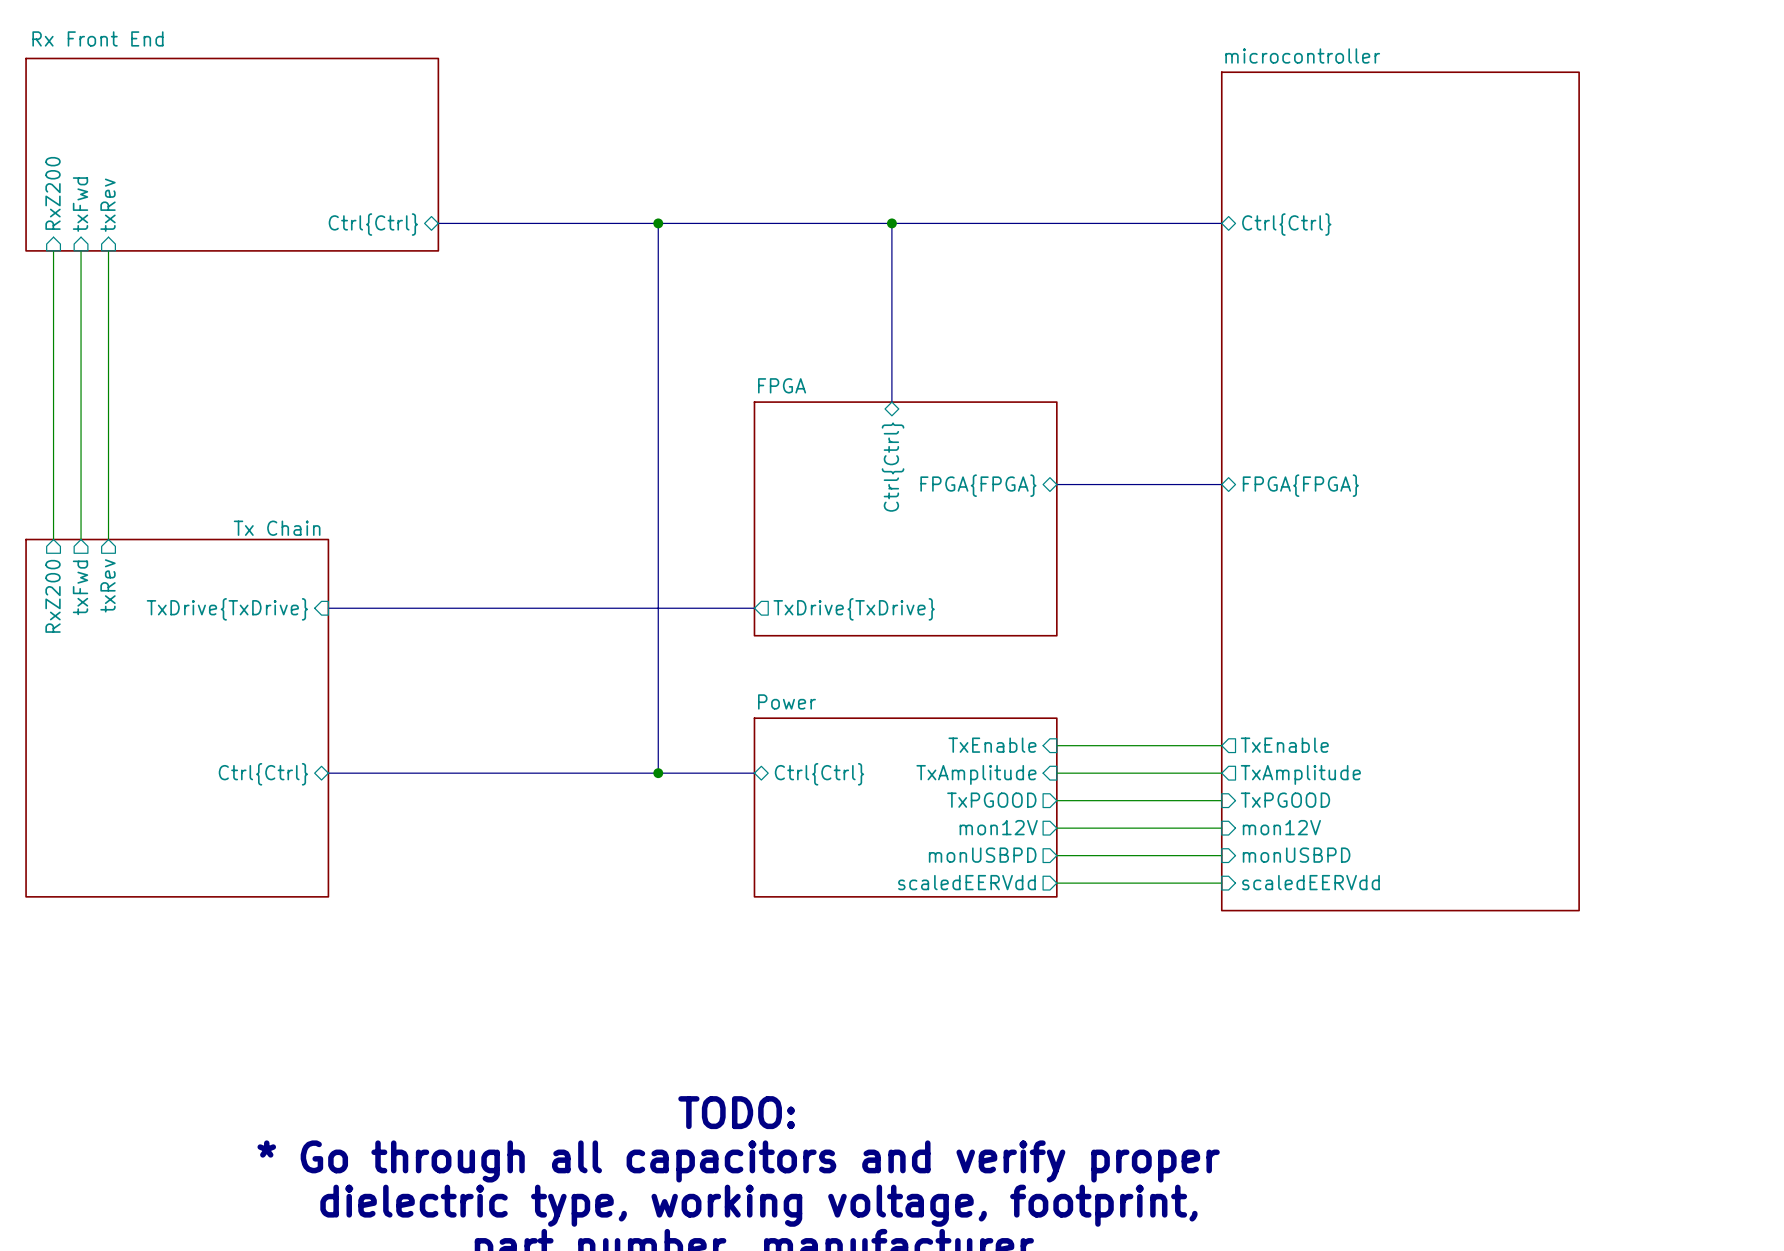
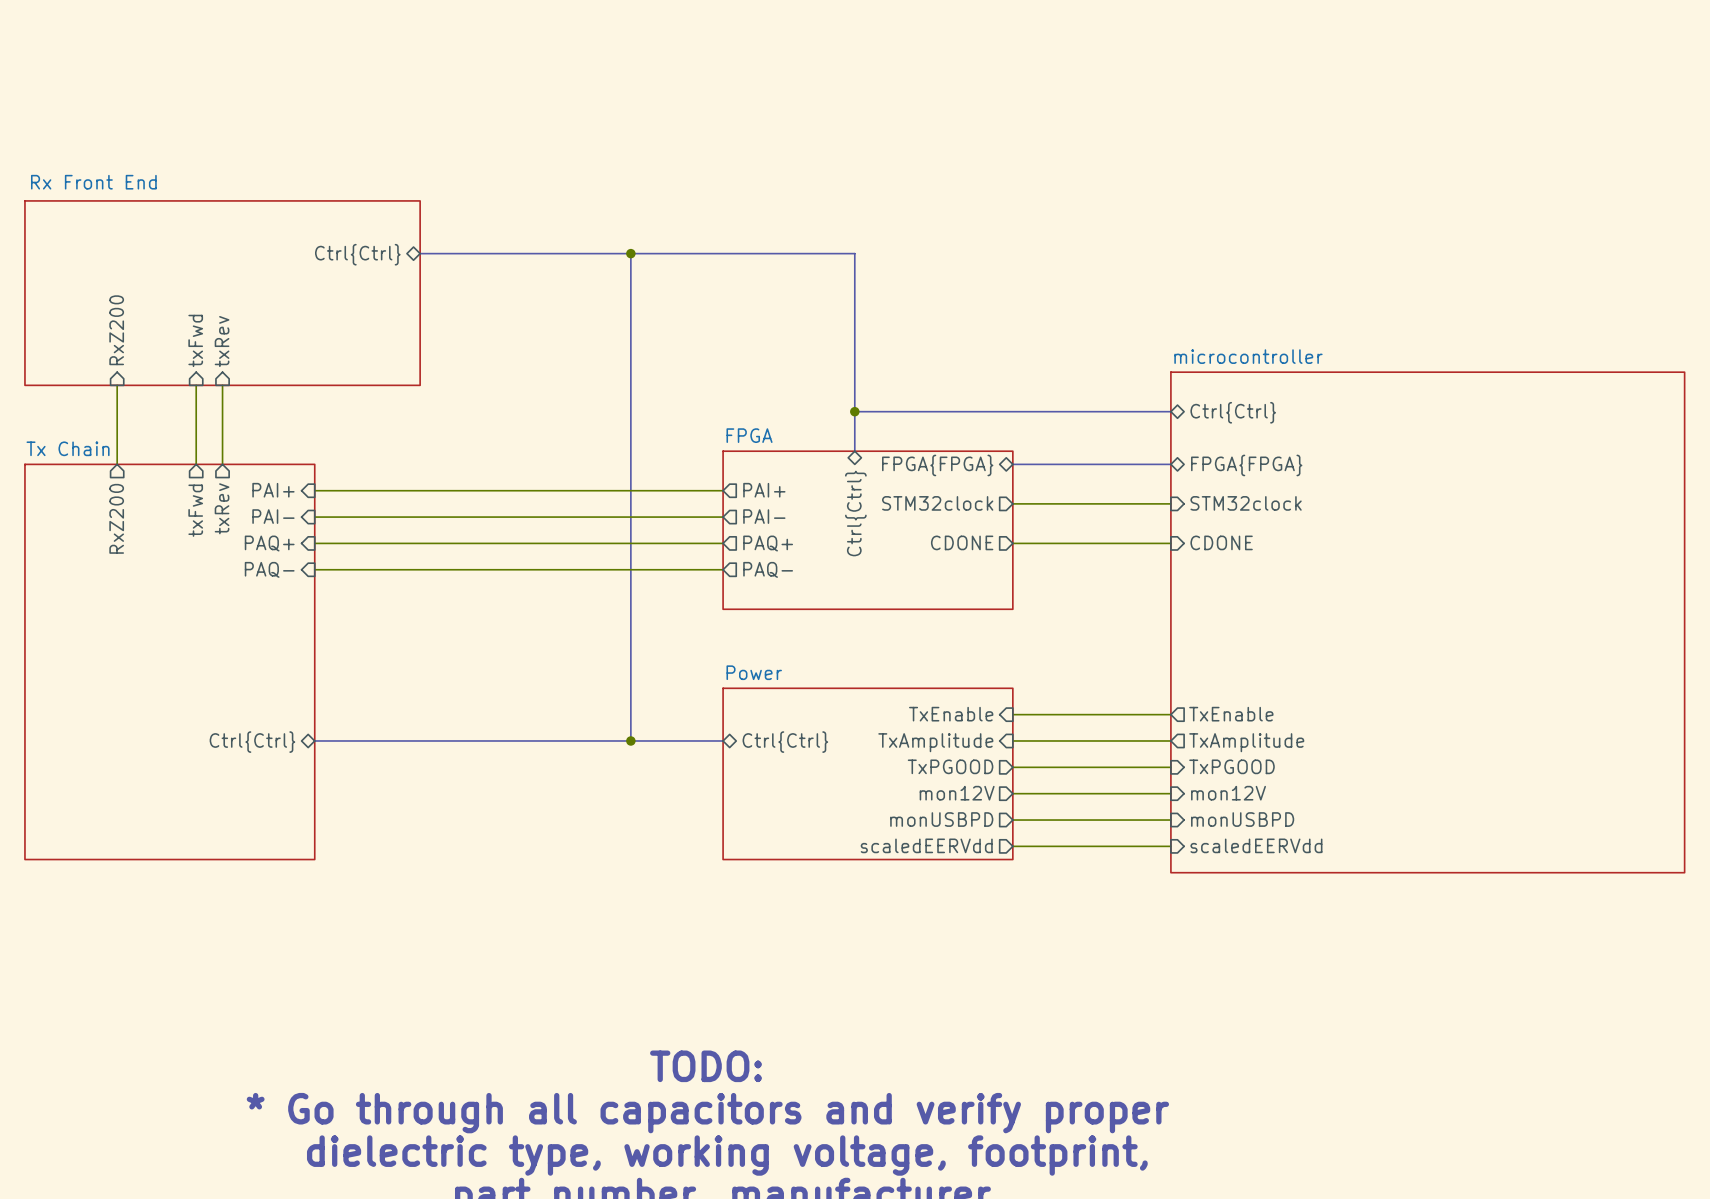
sheet Rx Front End position: (232, 154) -> (222, 293)
sheet pin: RxZ200 (53, 193) -> none
sheet pin: txFwd (80, 204) -> none
sheet pin: txRev (108, 205) -> none
bus: (438, 223) (1221, 223) -> none
bus: (658, 223) (658, 264) -> none
junction position: (658, 223) -> (630, 253)
bus: (891, 223) (891, 264) -> (420, 253) (854, 253)
junction: (891, 223) -> none
sheet pin position: Ctrl{Ctrl} (373, 224) -> Ctrl{Ctrl} (357, 254)
sheet pin: Ctrl{Ctrl} (1286, 224) -> none
wire: (53, 250) (53, 539) -> none
wire: (81, 250) (81, 539) -> none
wire: (108, 250) (108, 539) -> none
sheet pin: none -> RxZ200 (116, 330)
sheet pin: none -> txFwd (195, 340)
sheet pin: none -> txRev (222, 341)
wire: none -> (117, 385) (117, 464)
wire: none -> (196, 385) (196, 464)
wire: none -> (222, 385) (222, 464)
bus: none -> (854, 385) (854, 451)
bus: none -> (854, 411) (1170, 411)
junction: none -> (854, 411)
sheet pin: none -> Ctrl{Ctrl} (1233, 412)
sheet pin position: Ctrl{Ctrl} (893, 467) -> Ctrl{Ctrl} (855, 513)
sheet microcontroller: (1400, 491) -> none
sheet pin: none -> PAI+ (273, 490)
sheet pin: none -> PAI+ (764, 490)
wire: none -> (314, 490) (723, 490)
sheet FPGA: (905, 518) -> none
sheet pin: none -> STM32clock (937, 503)
wire: none -> (1012, 503) (1170, 503)
sheet pin: none -> STM32clock (1246, 503)
sheet pin: none -> txRev (222, 508)
sheet pin: none -> txFwd (195, 510)
sheet pin: none -> PAI- (273, 516)
wire: none -> (314, 517) (723, 517)
sheet pin: none -> PAI- (764, 516)
sheet FPGA: none -> (867, 530)
sheet pin: none -> CDONE (962, 542)
sheet pin: none -> CDONE (1221, 542)
sheet pin: none -> PAQ+ (269, 543)
wire: none -> (314, 543) (723, 543)
sheet pin: none -> PAQ+ (768, 543)
wire: none -> (1012, 543) (1170, 543)
sheet pin: txRev (108, 585) -> none
sheet pin: txFwd (80, 587) -> none
sheet pin: none -> PAQ- (269, 569)
wire: none -> (314, 569) (723, 569)
sheet pin: none -> PAQ- (768, 569)
sheet pin position: RxZ200 (53, 596) -> RxZ200 (116, 518)
bus: (328, 608) (754, 608) -> none
sheet pin: TxDrive{TxDrive} (227, 609) -> none
sheet pin: TxDrive{TxDrive} (854, 609) -> none
sheet microcontroller: none -> (1427, 622)
sheet Tx Chain: none -> (169, 661)
sheet Tx Chain: (177, 718) -> none

